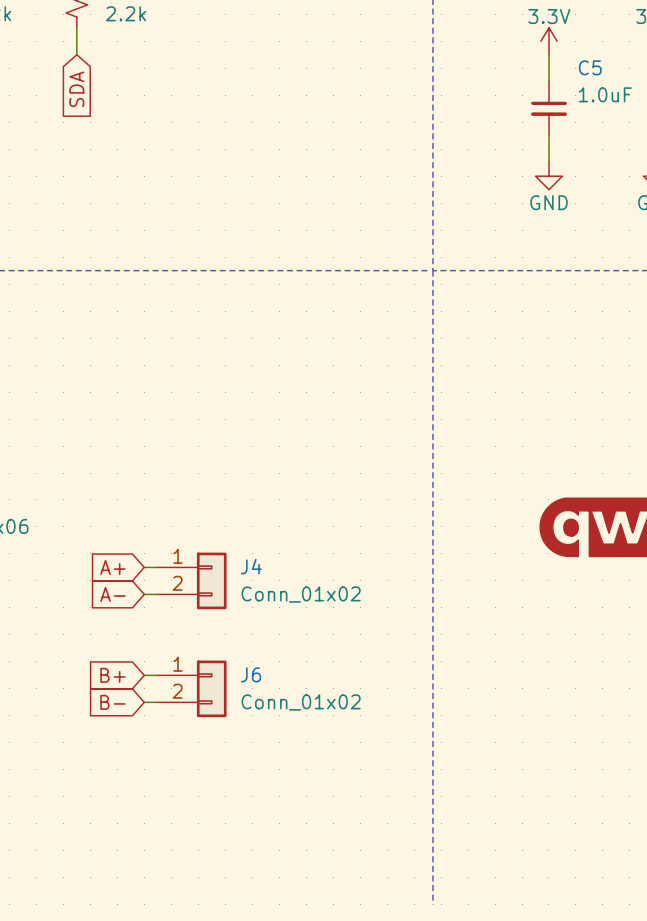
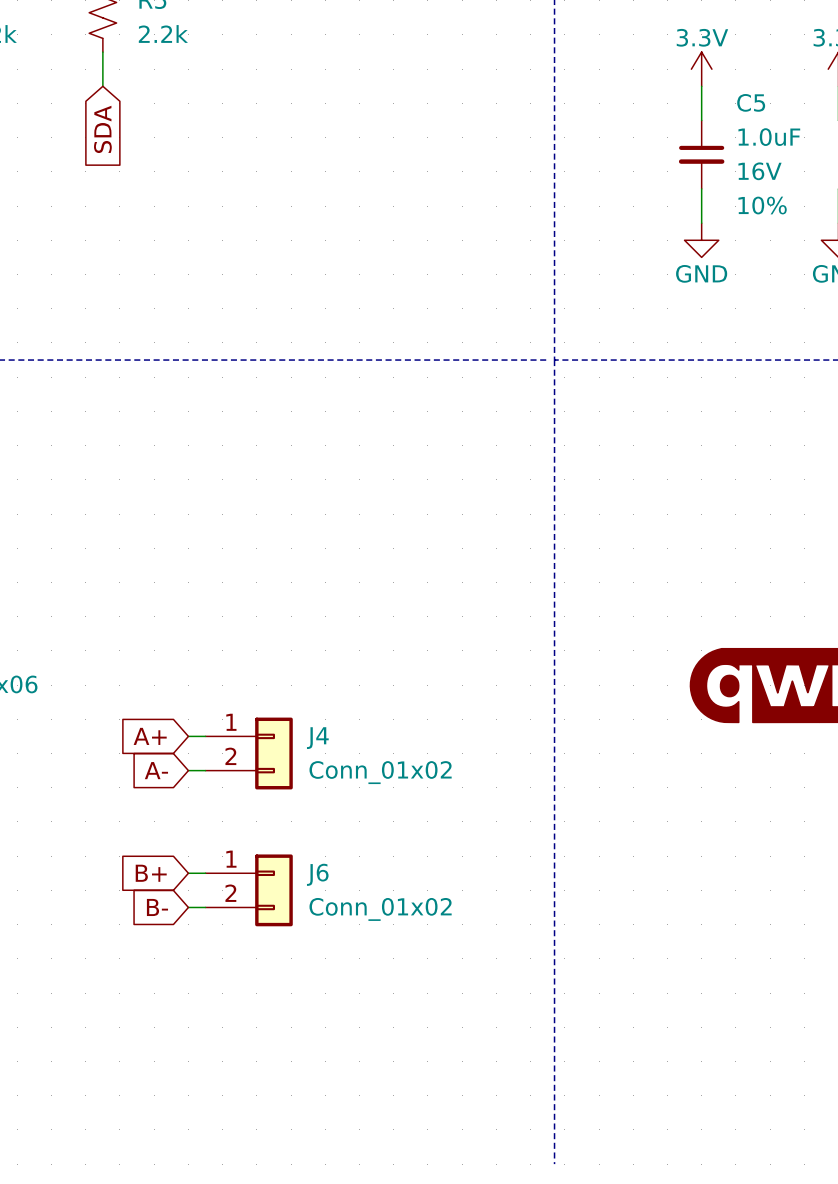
C5 text: none -> 16V (760, 171)
C5 text: none -> 10% (762, 205)

